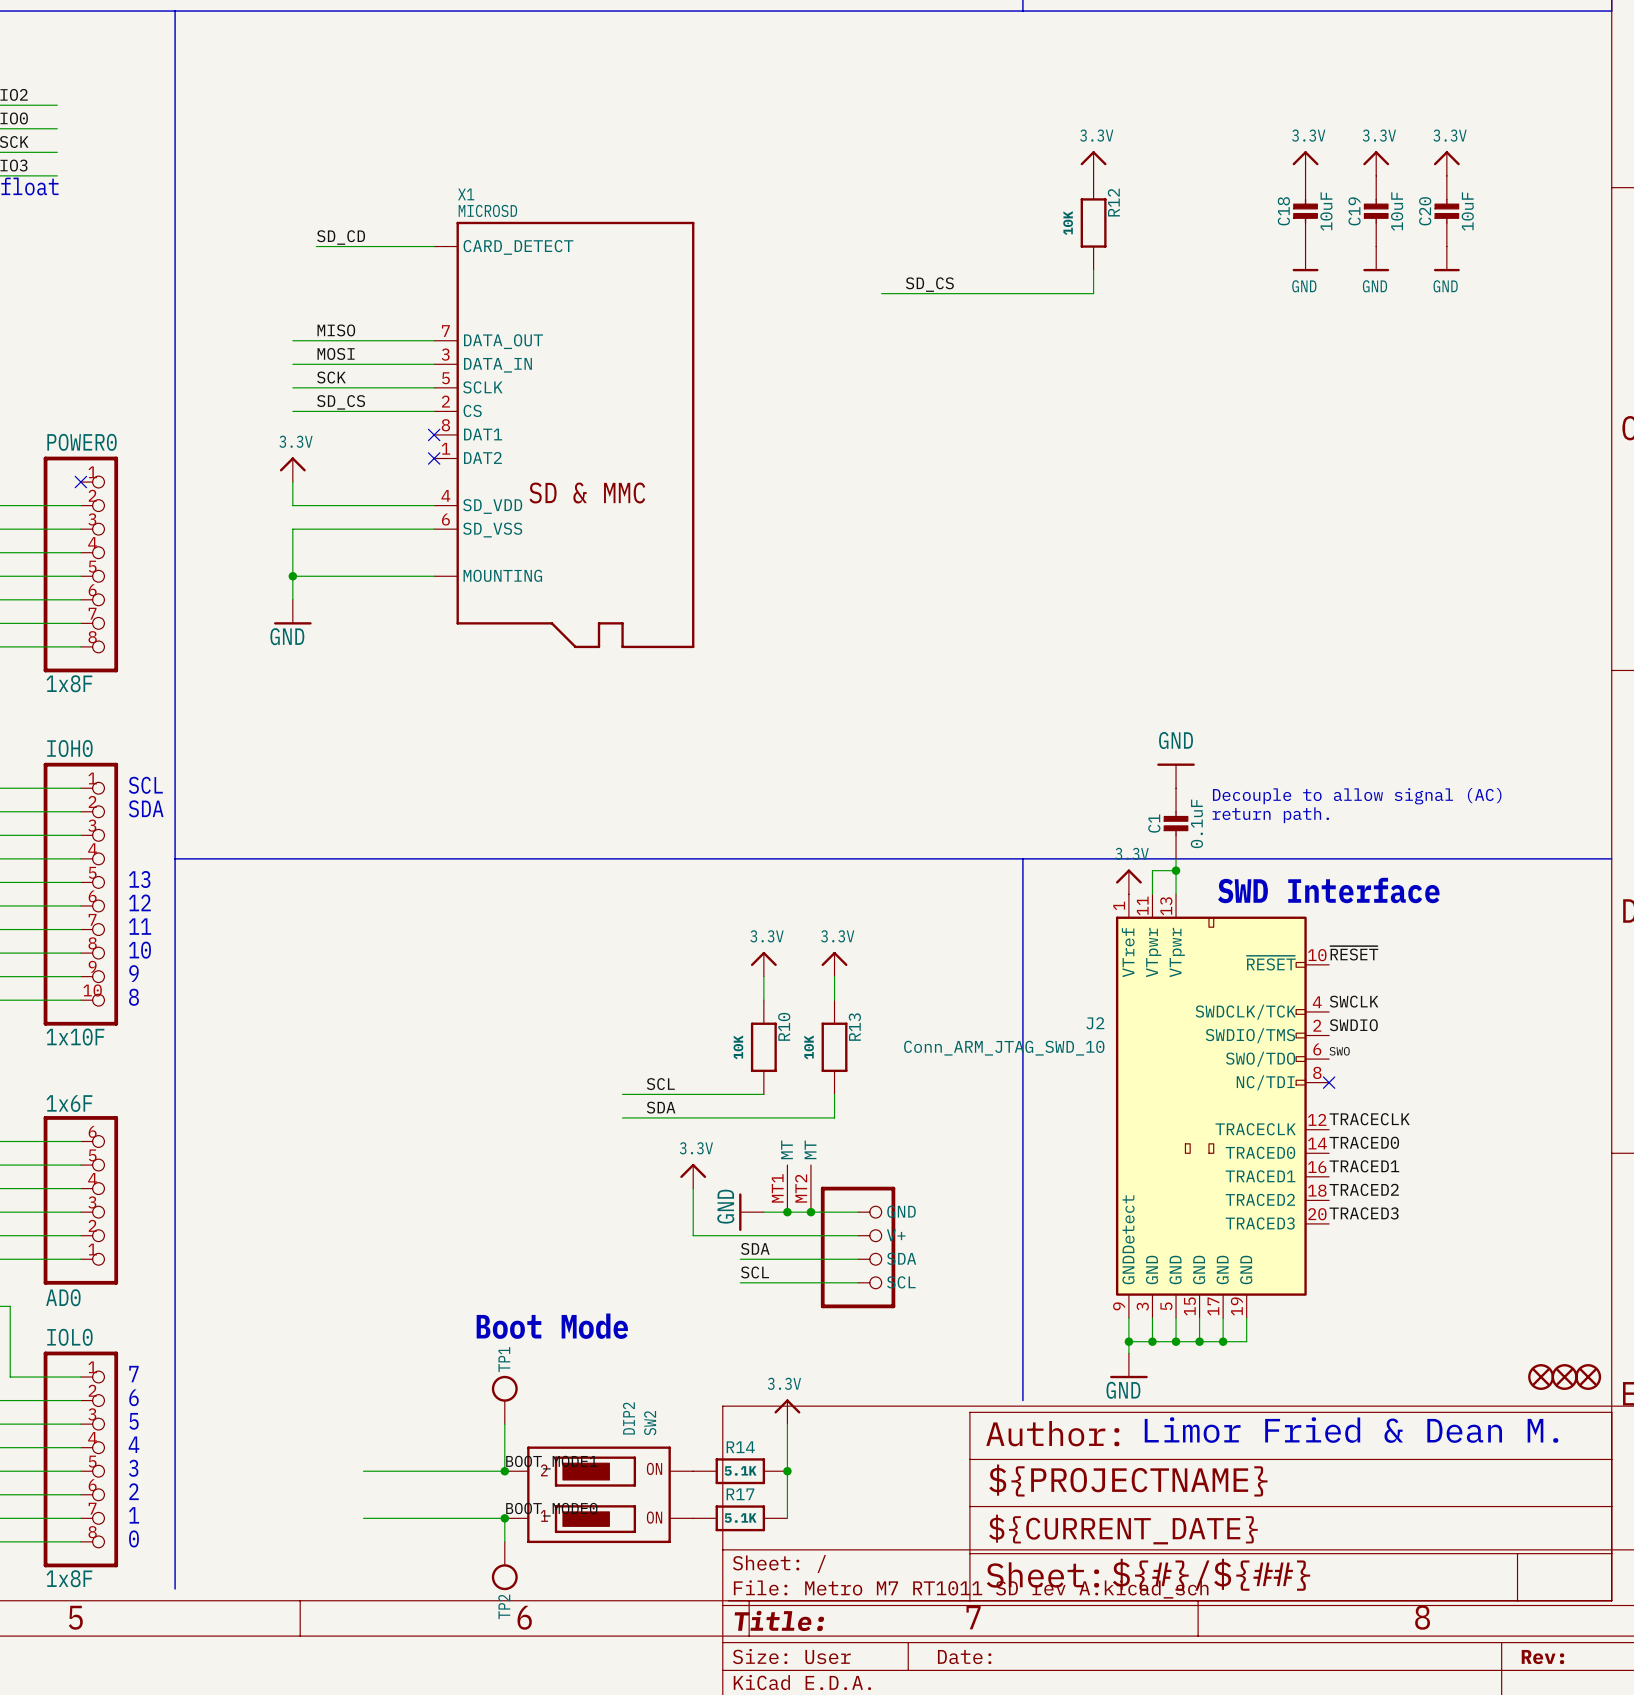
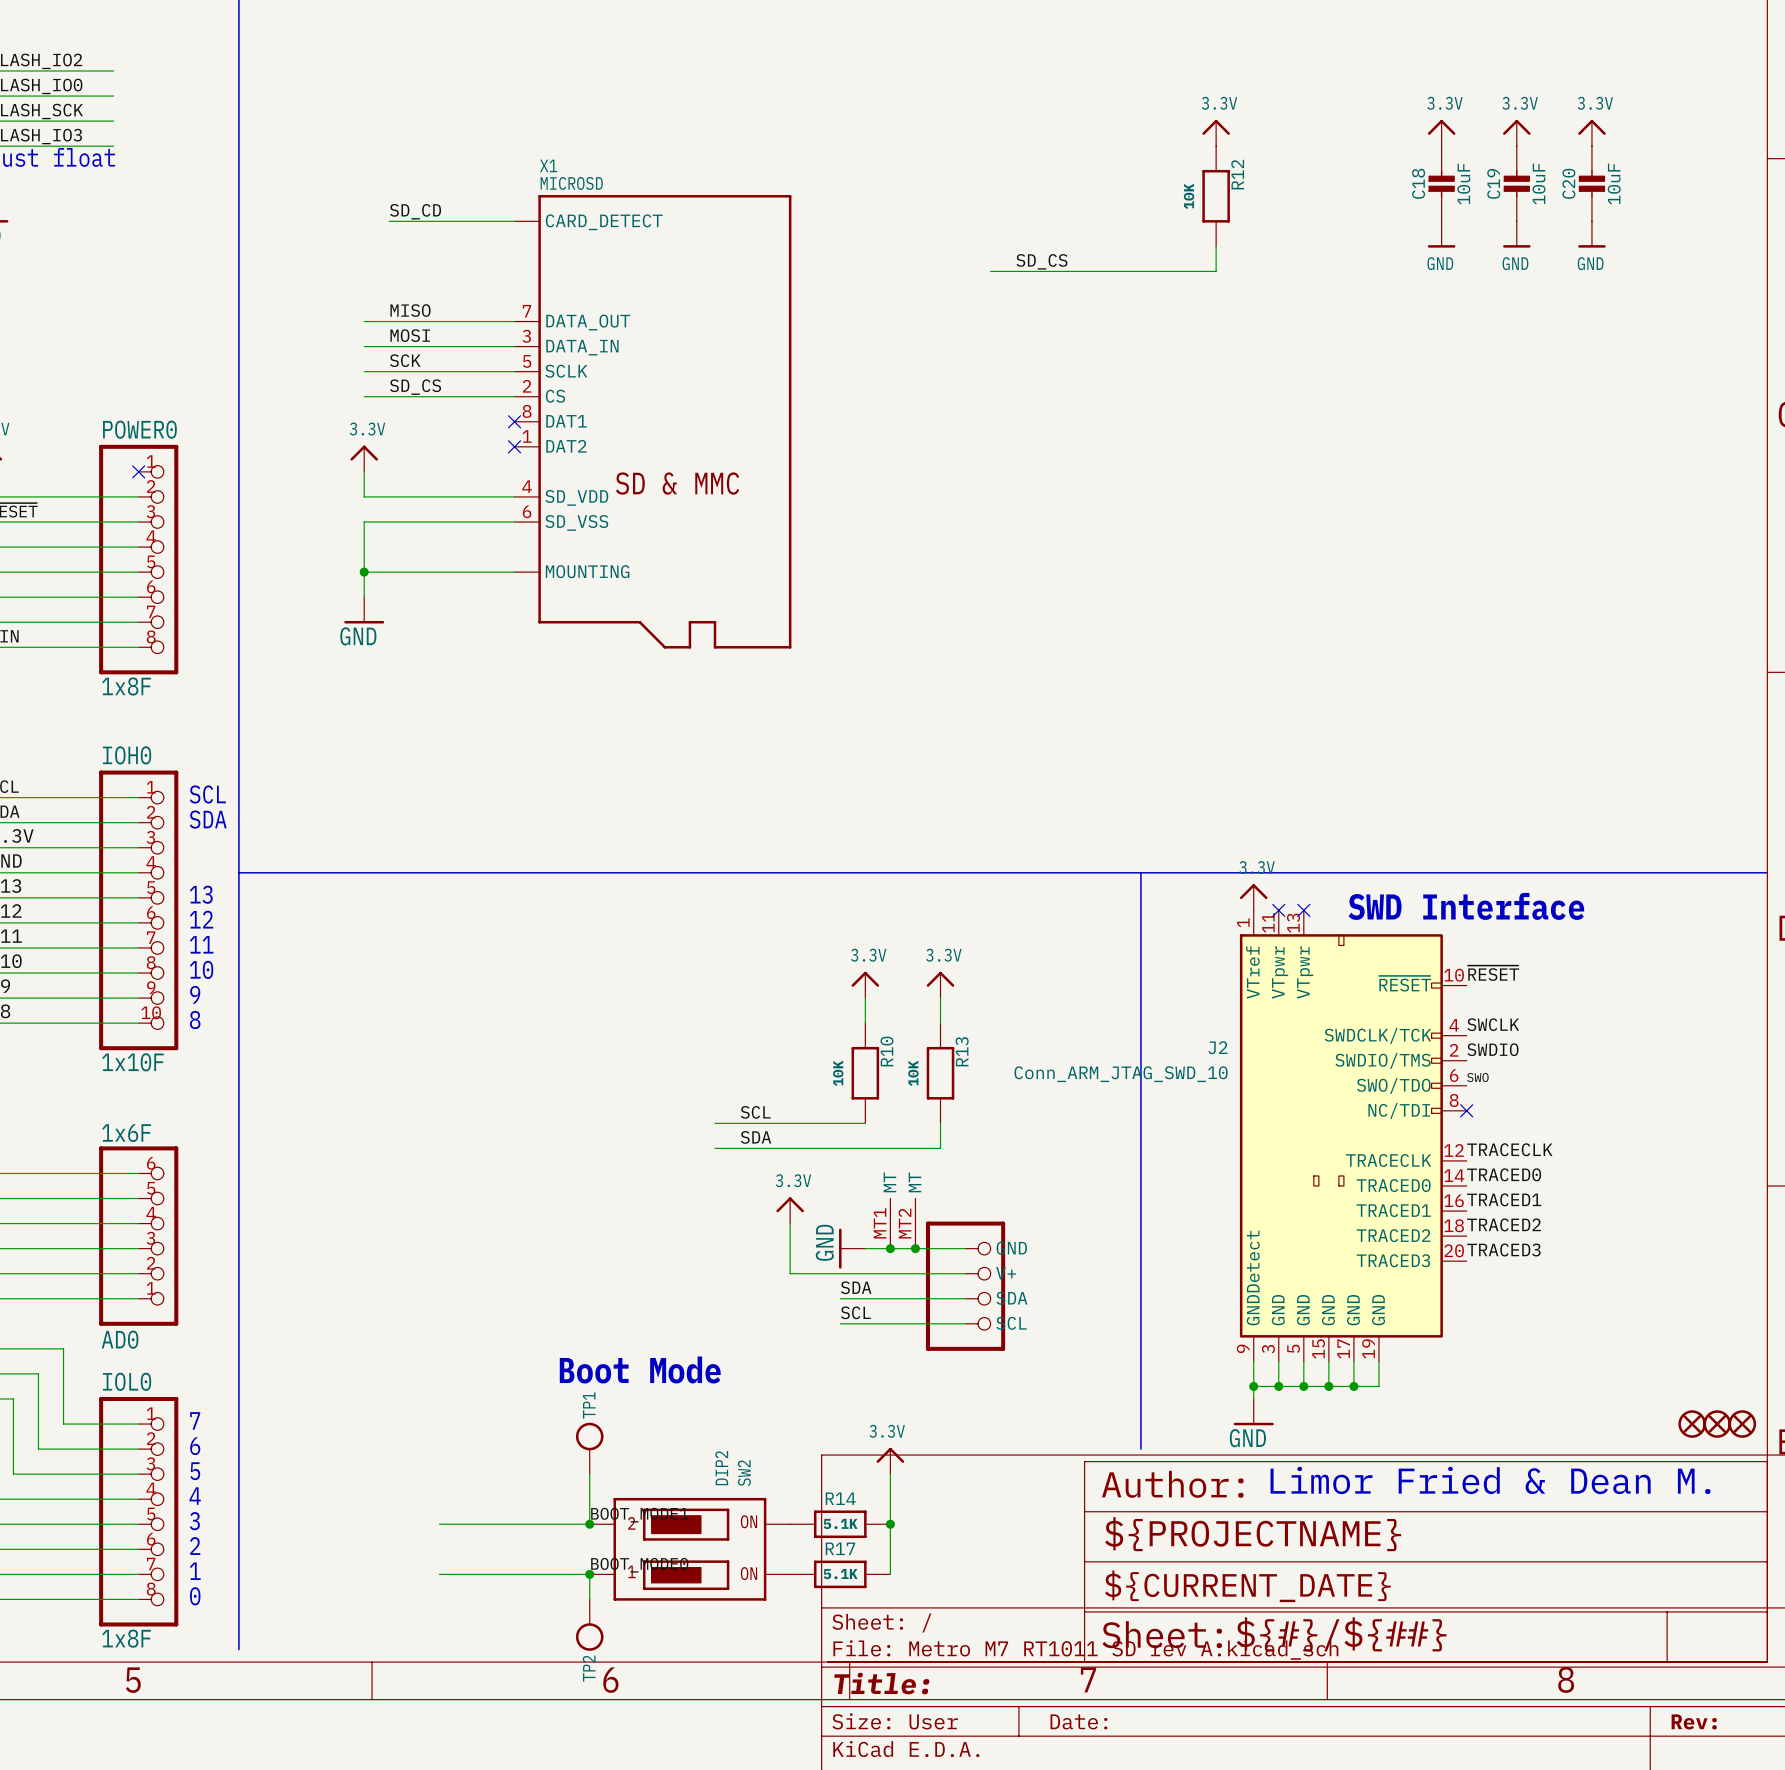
power symbol: GND (1176, 775) -> none
text: Decouple to allow signal (AC) (1357, 796) -> none
text: return path. (1270, 815) -> none
C1: 0.1uF (1176, 823) -> none
wire: (1176, 858) (1176, 894) -> none
wire: (1176, 870) (1152, 870) (1152, 894) -> none
junction: (1176, 870) -> none
no-connect mark: none -> (1278, 910)
no-connect mark: none -> (1303, 910)

